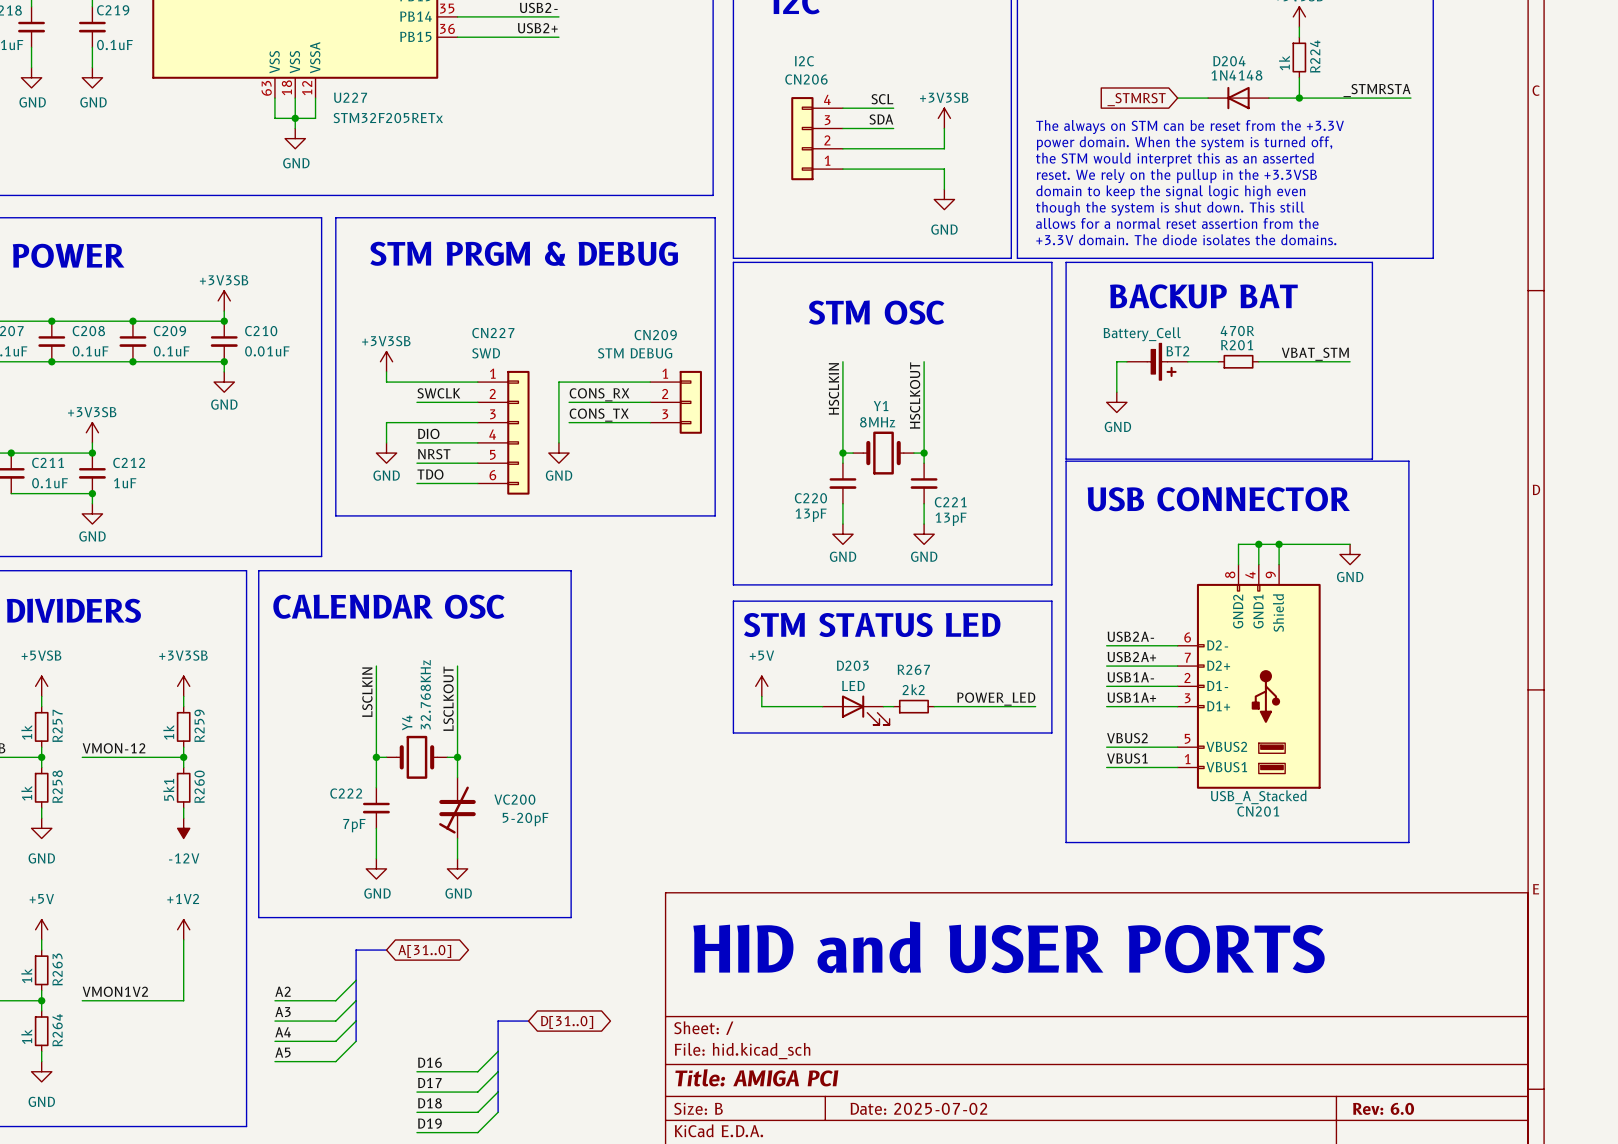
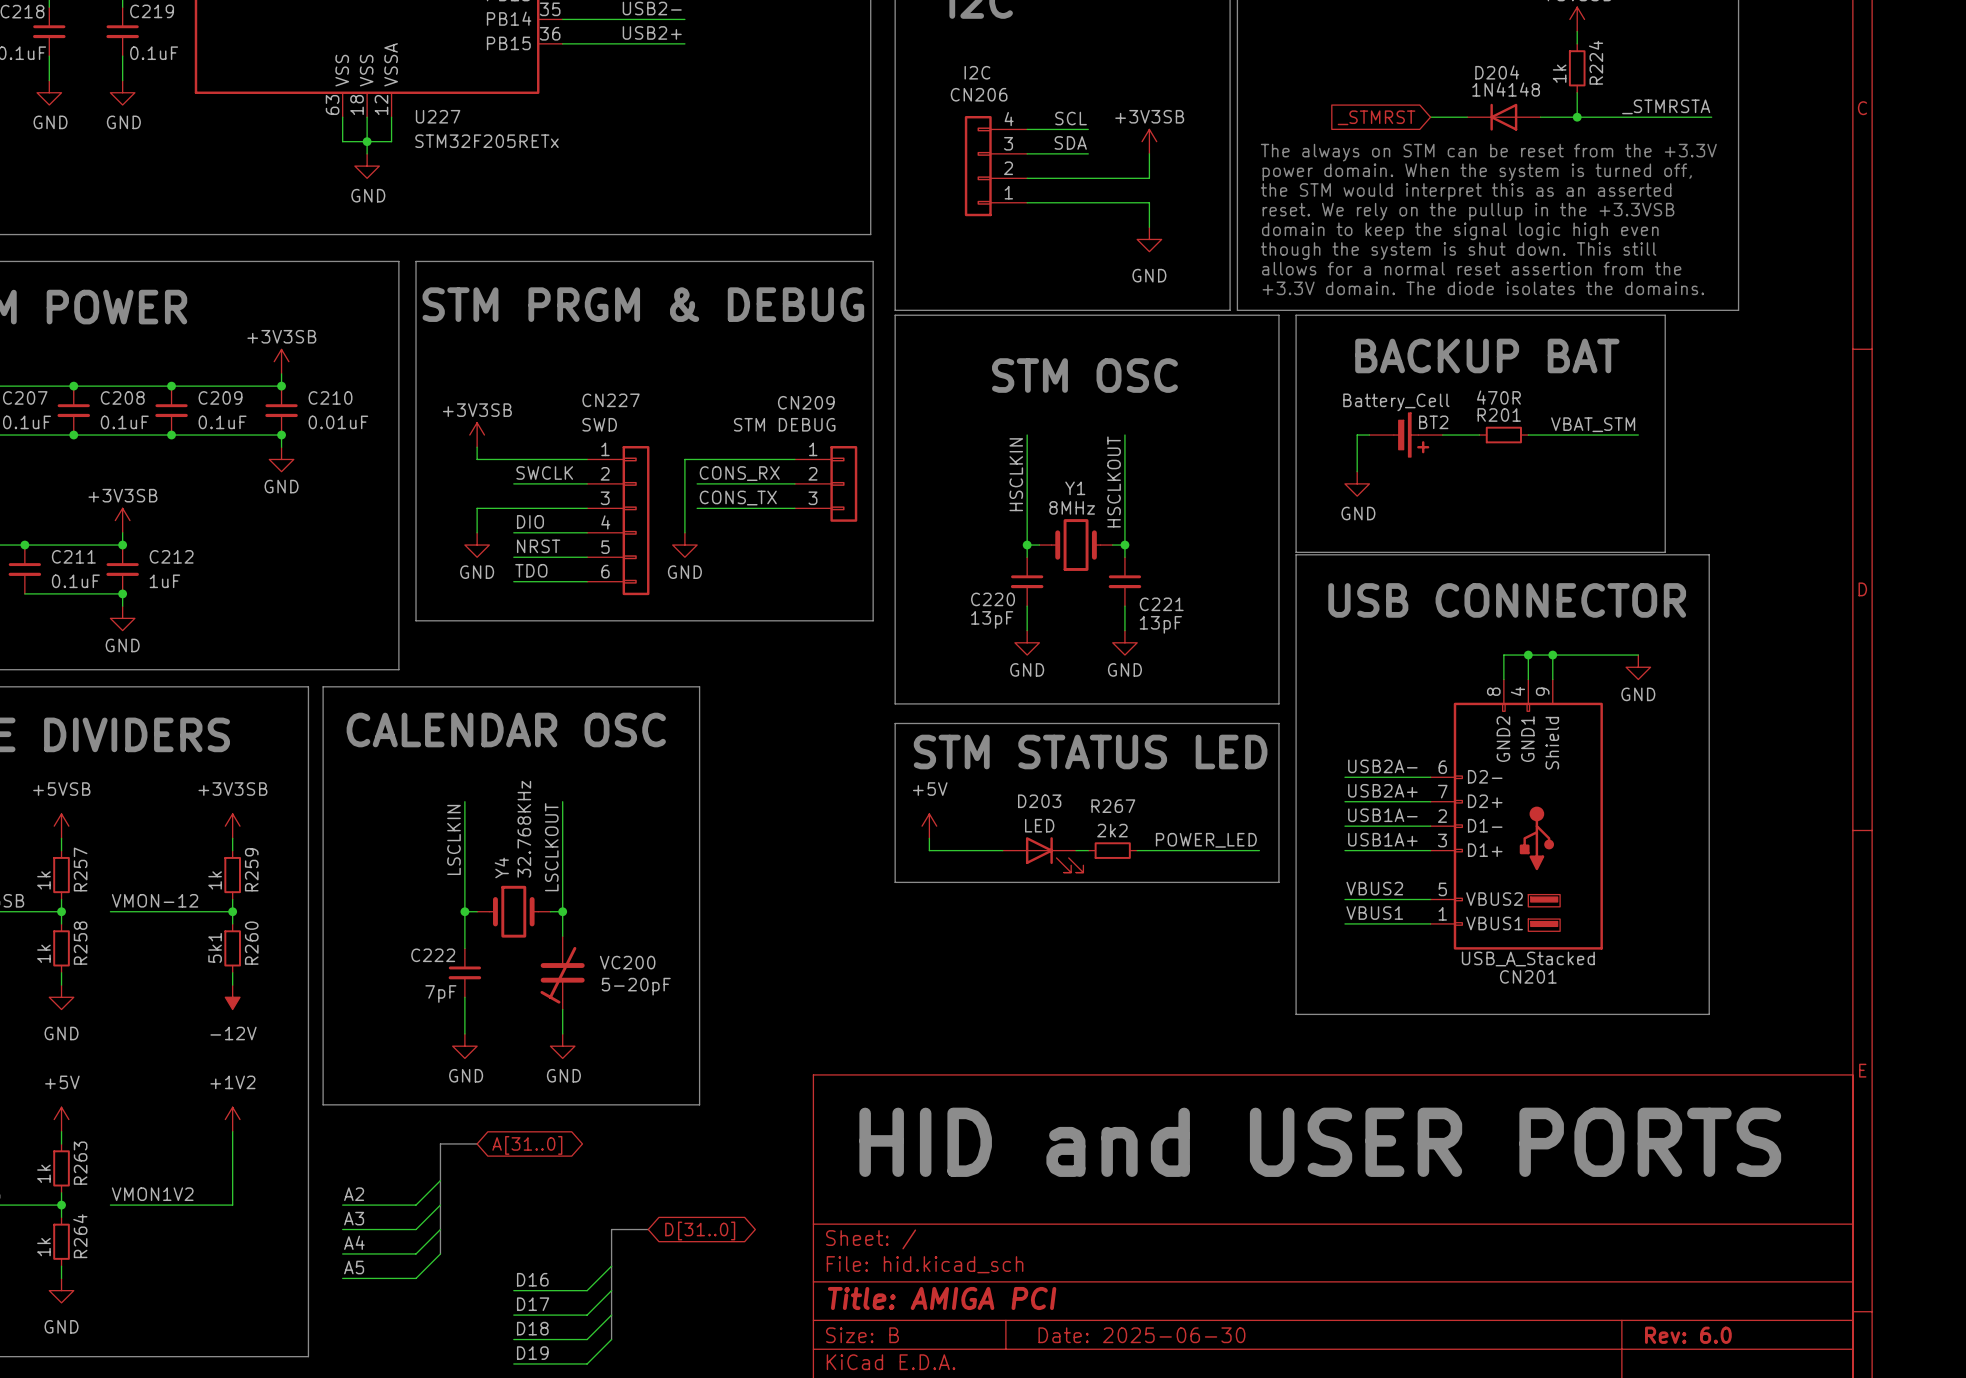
title block: Date: 2025-07-02 (918, 1108) -> Date: 2025-06-30 (1141, 1335)

